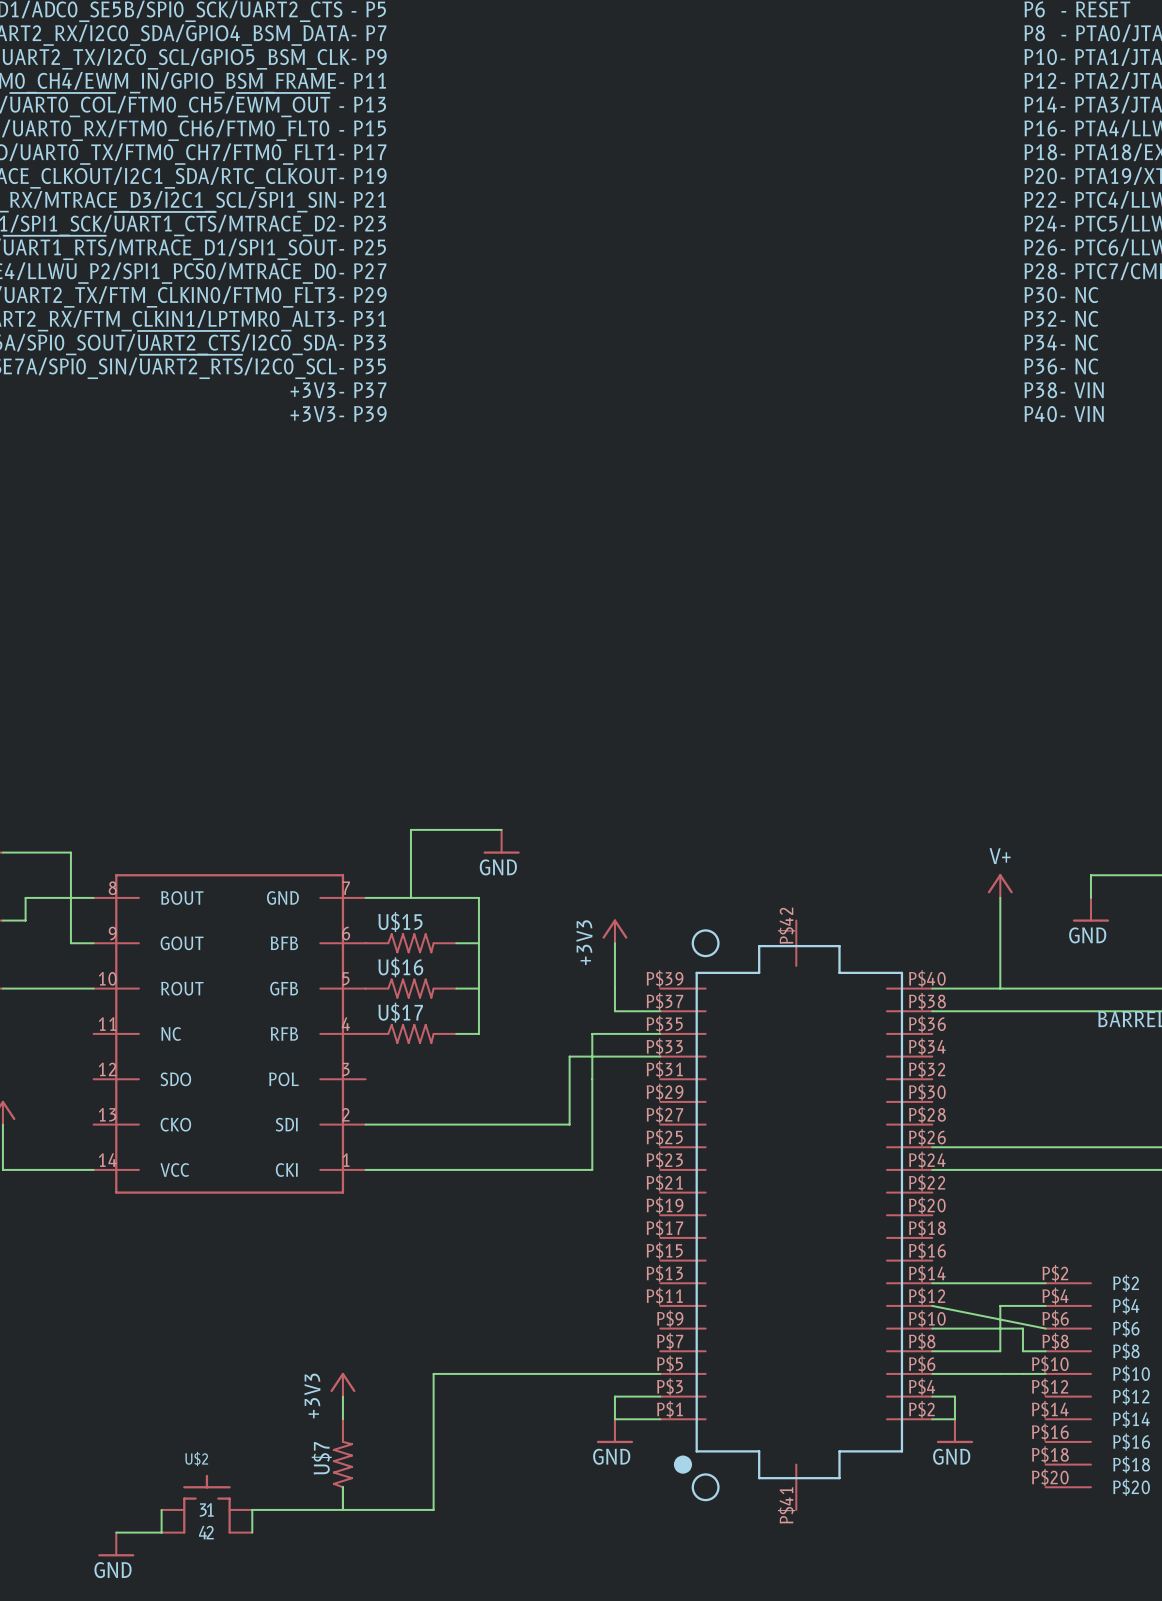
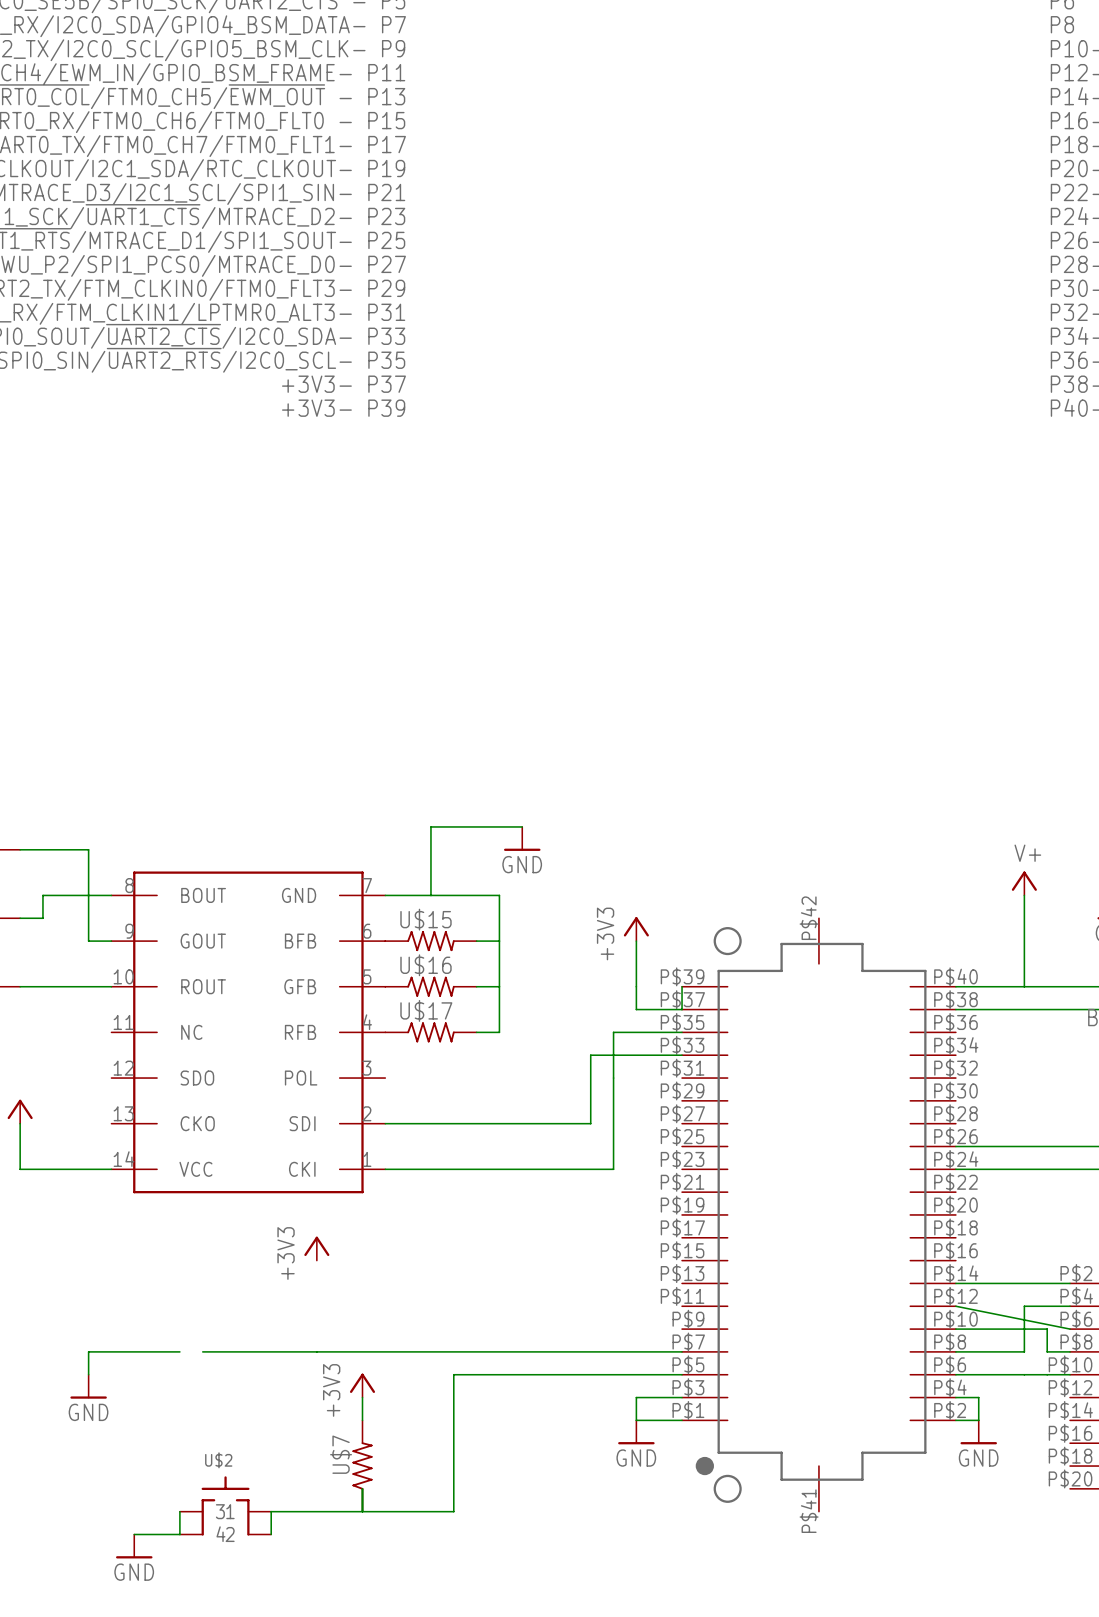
wire: none -> (682, 986) (682, 1009)
power symbol: none -> +3V3 (316, 1248)
wire: none -> (179, 1351) (88, 1351) (88, 1374)
wire: none -> (202, 1351) (682, 1351)
power symbol: none -> GND (88, 1386)

